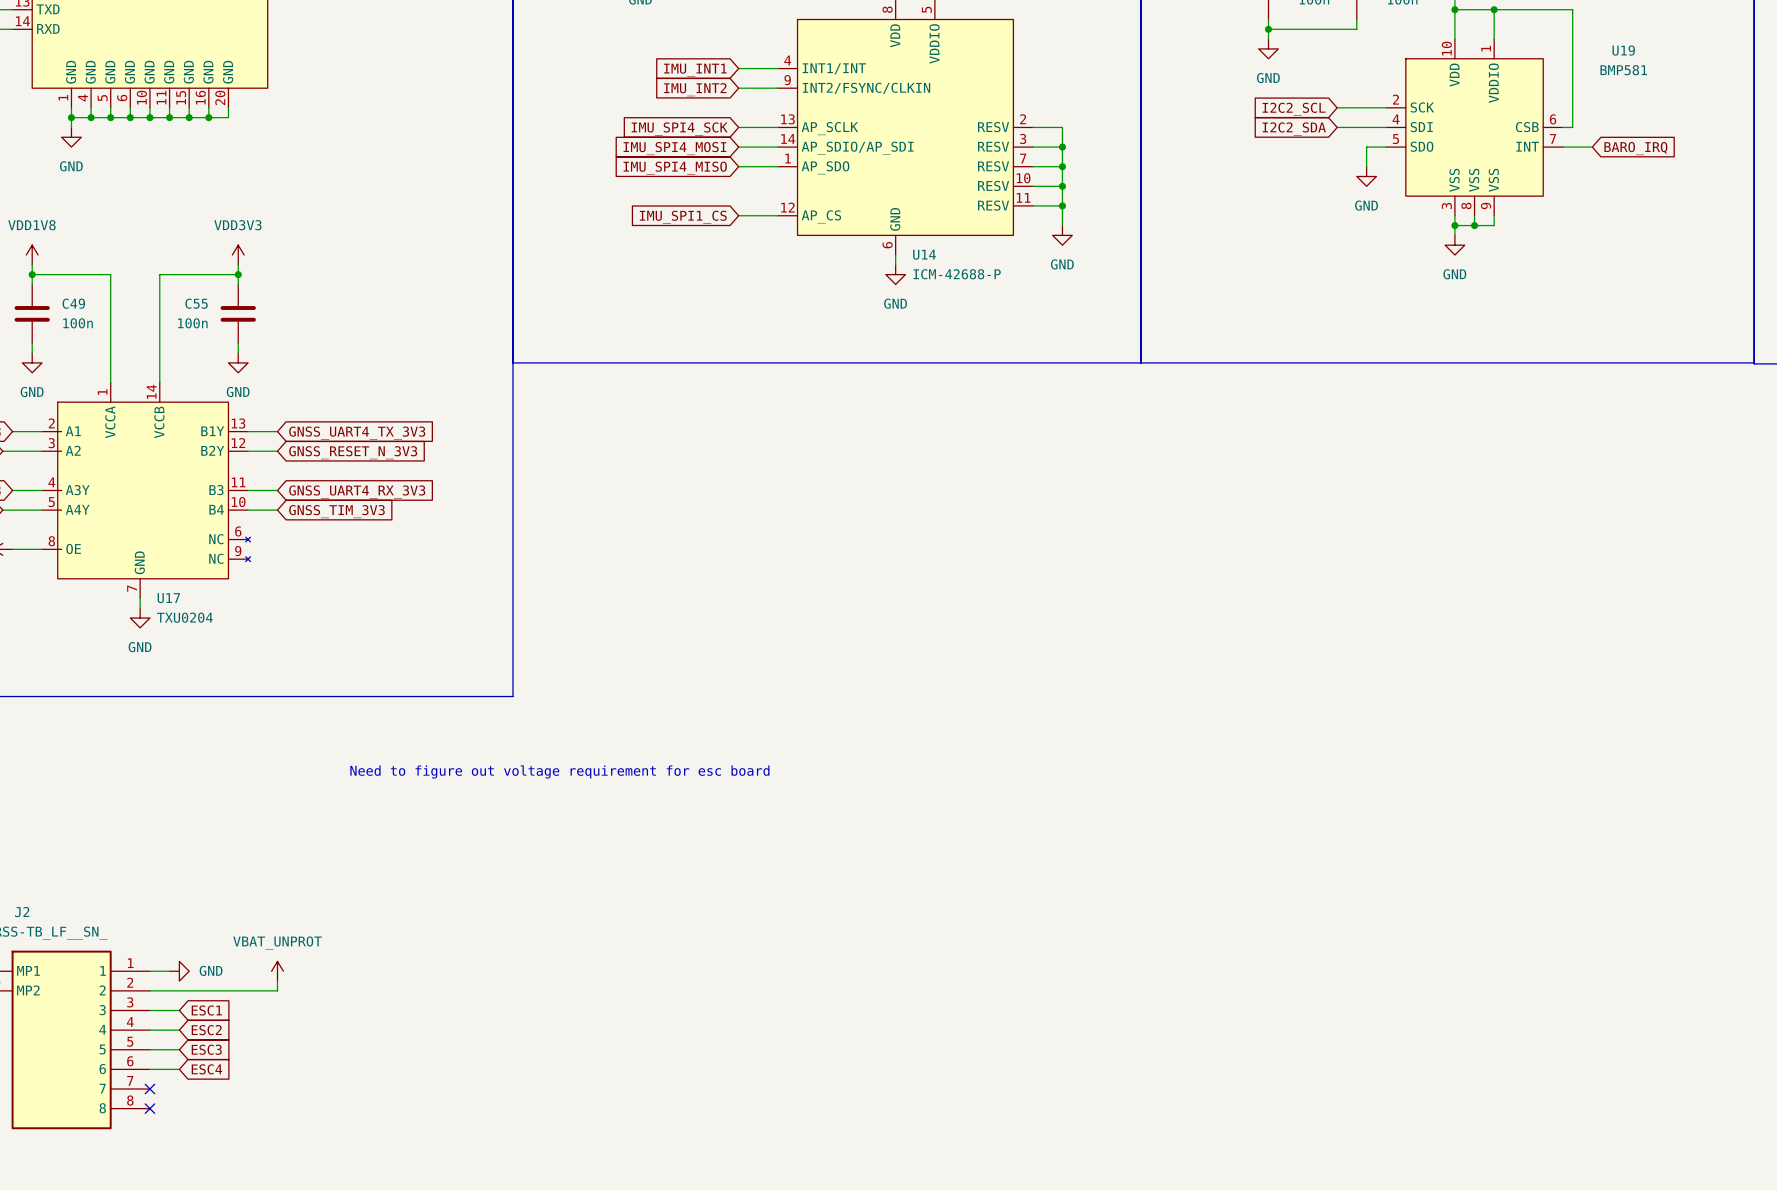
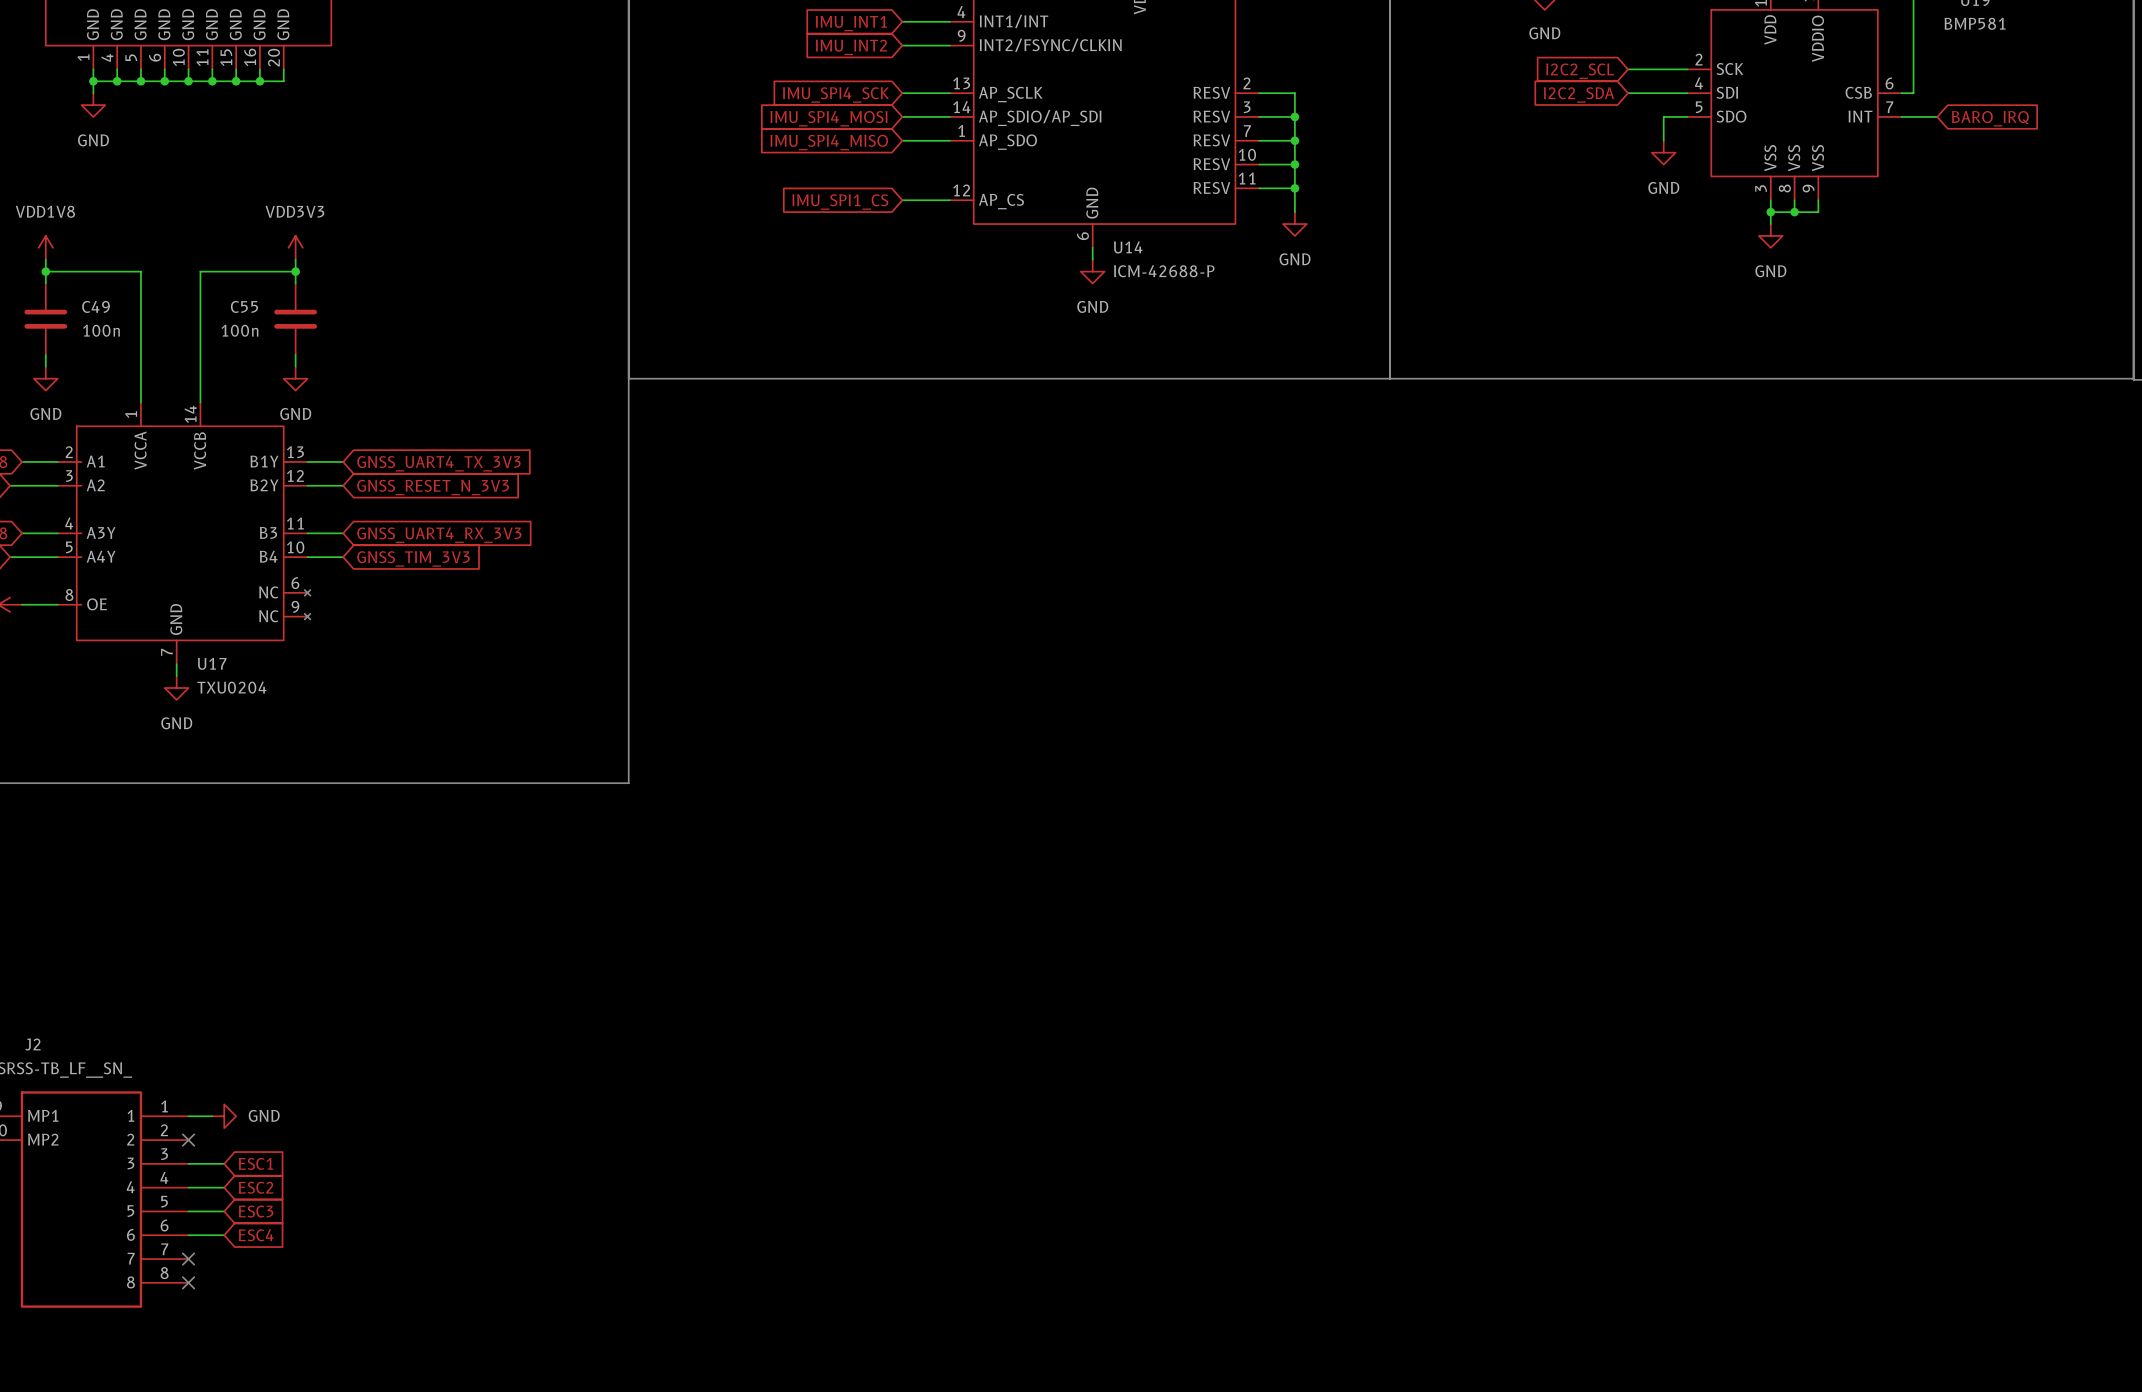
text: Need to figure out voltage requirement for esc board (559, 771) -> none
power symbol: VBAT_UNPROT (277, 971) -> none
wire: (277, 981) (277, 990) (149, 990) -> none
no-connect mark: none -> (188, 1140)

